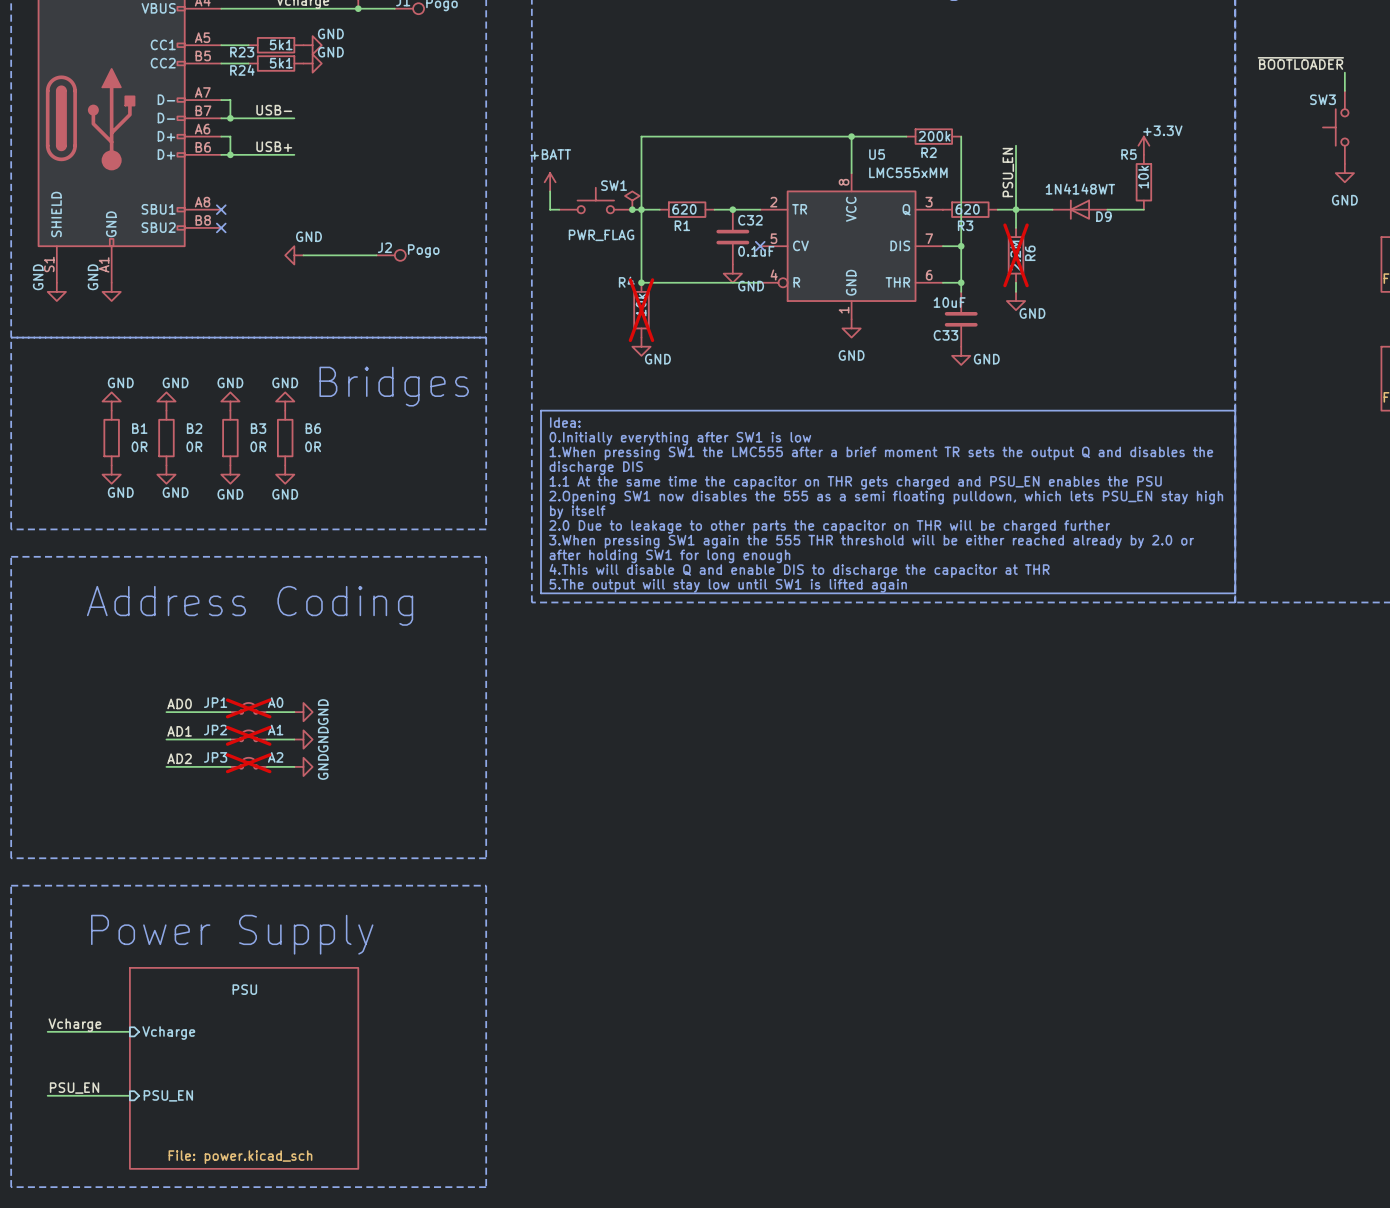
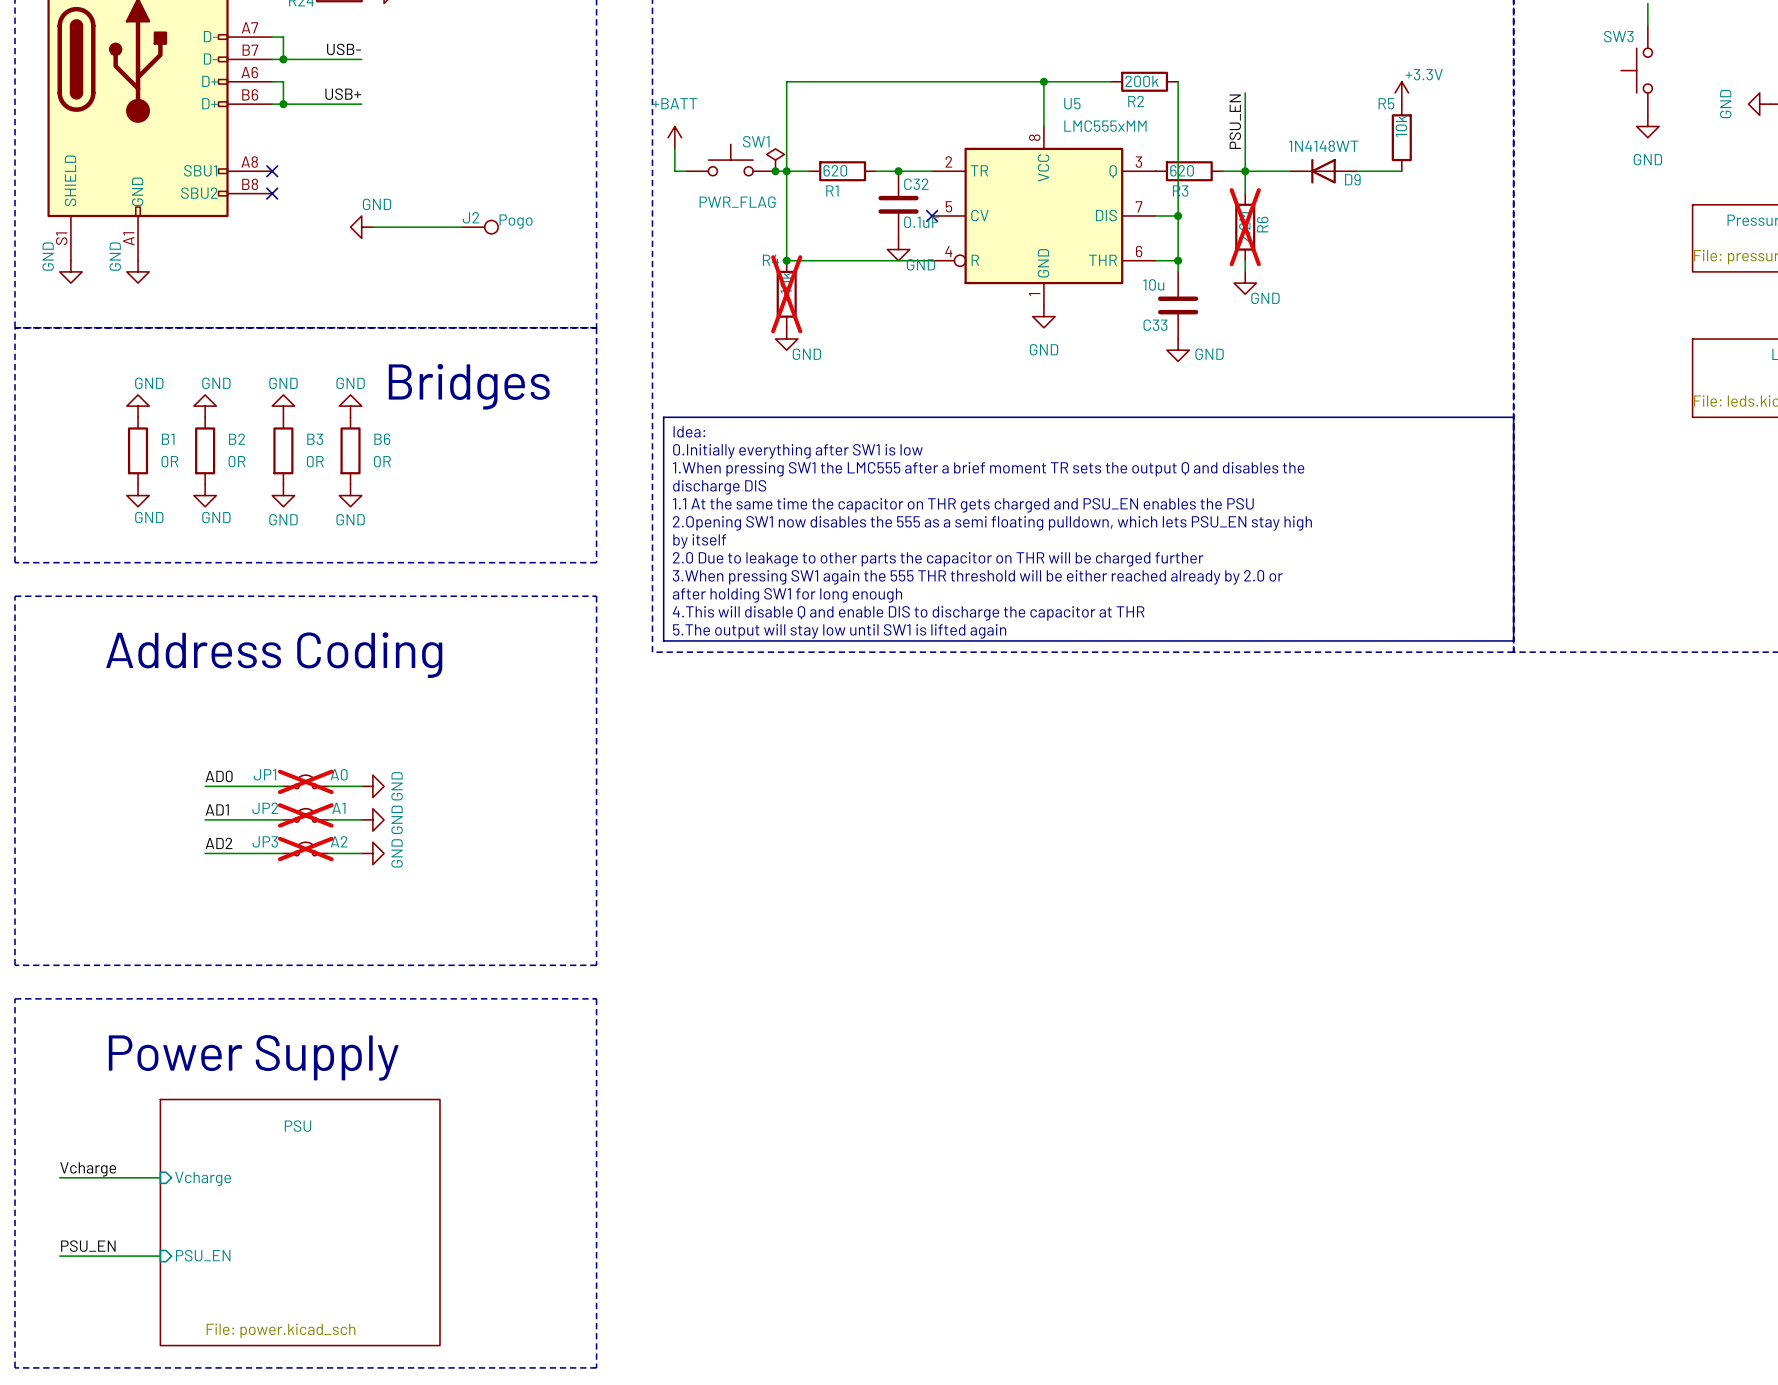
C33 value: 10uF (949, 302) -> 10u (1153, 284)

